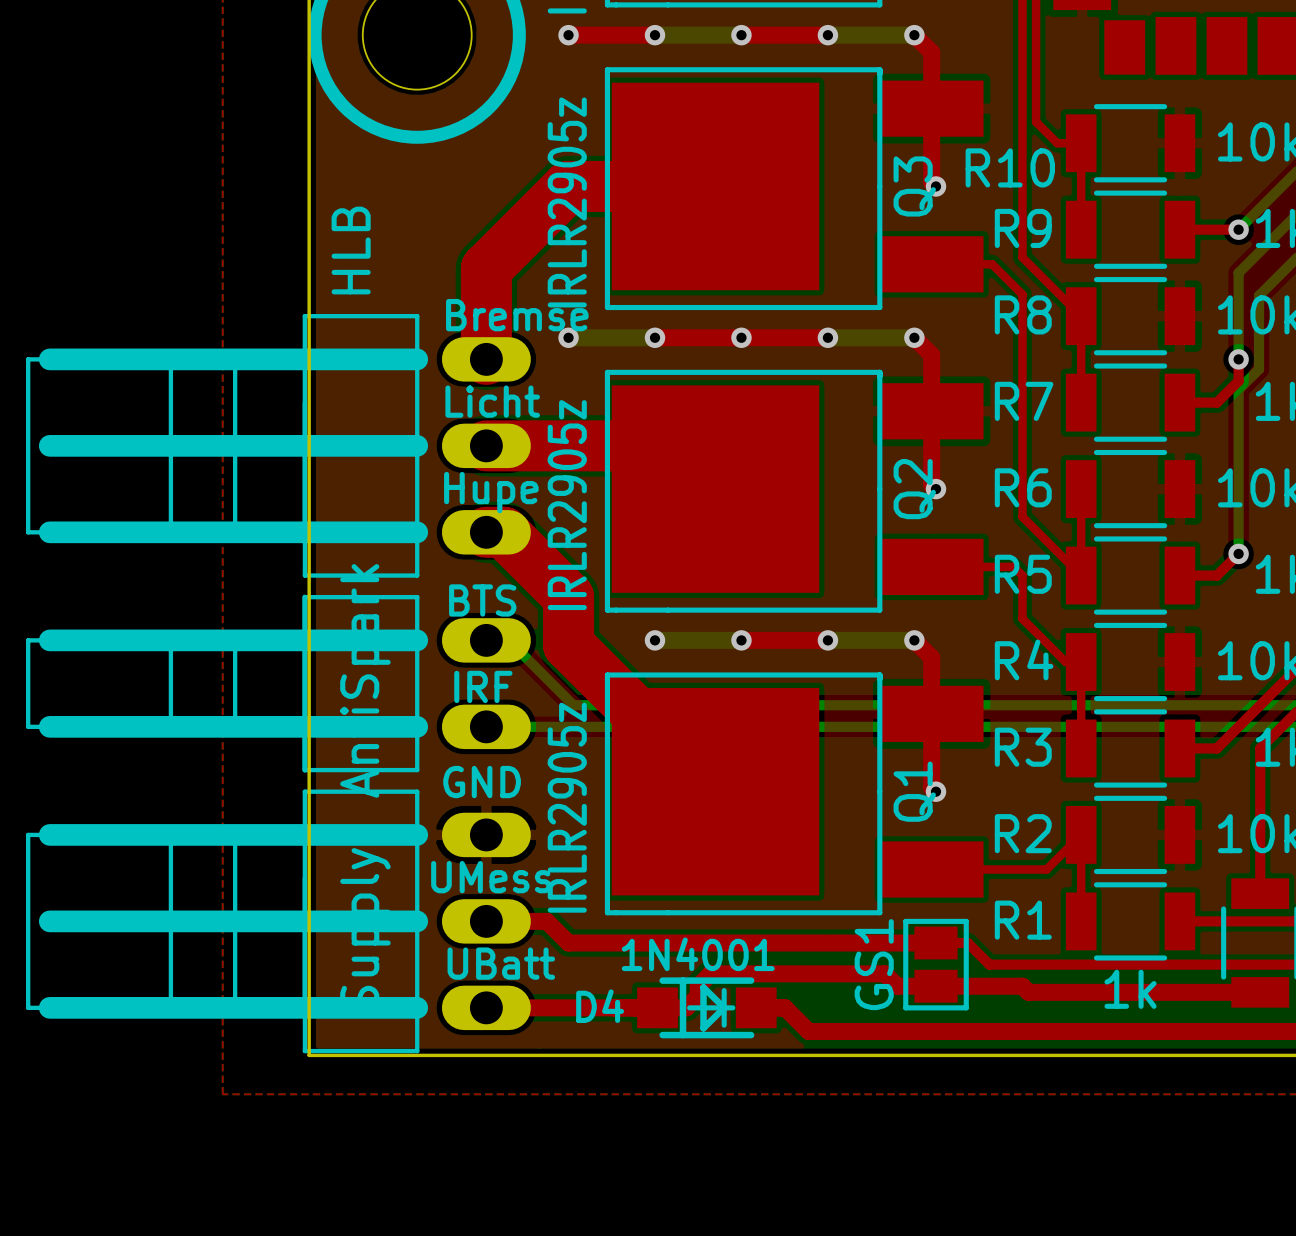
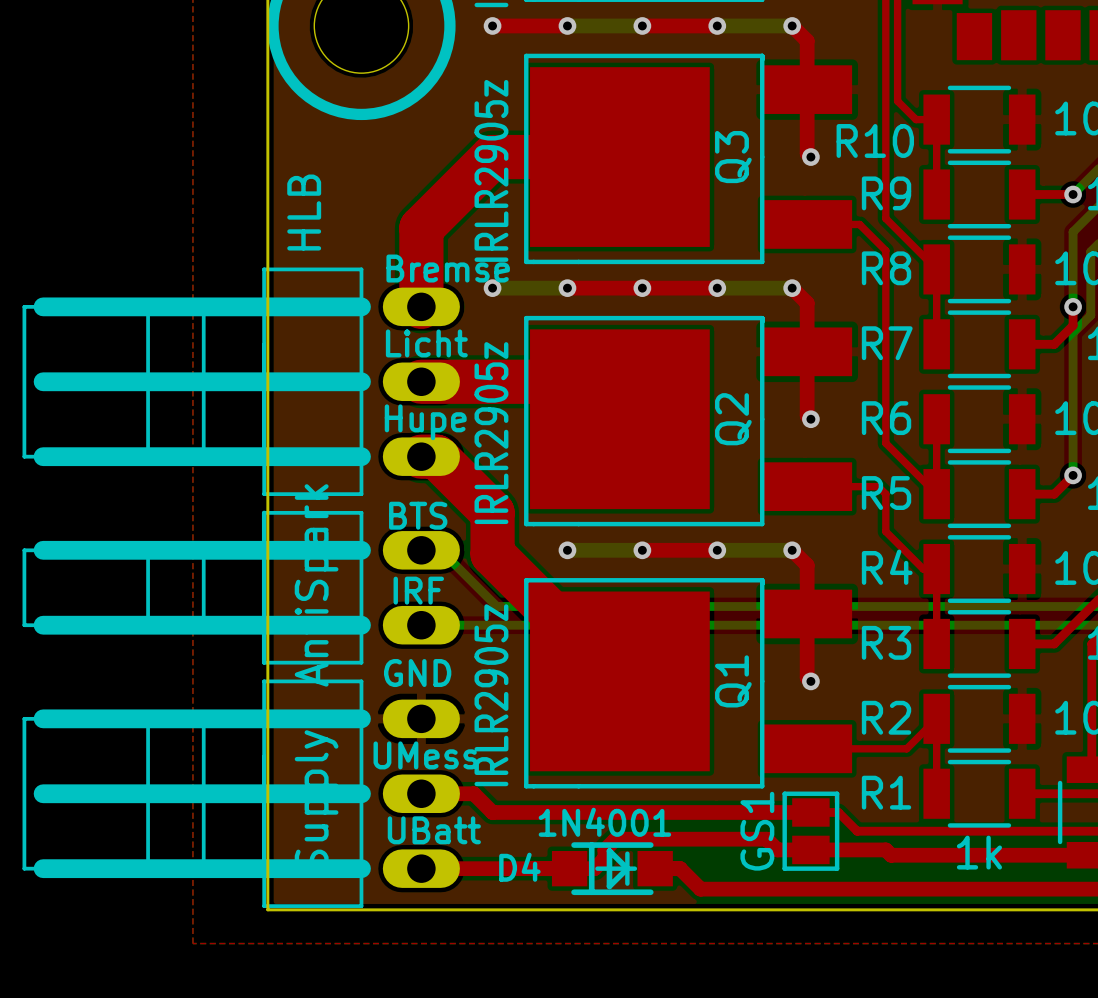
Q3 name position: Q3 (914, 186) -> Q3 (733, 157)
Q2 name position: Q2 (914, 489) -> Q2 (733, 419)
Q1 name position: Q1 (914, 791) -> Q1 (733, 681)

